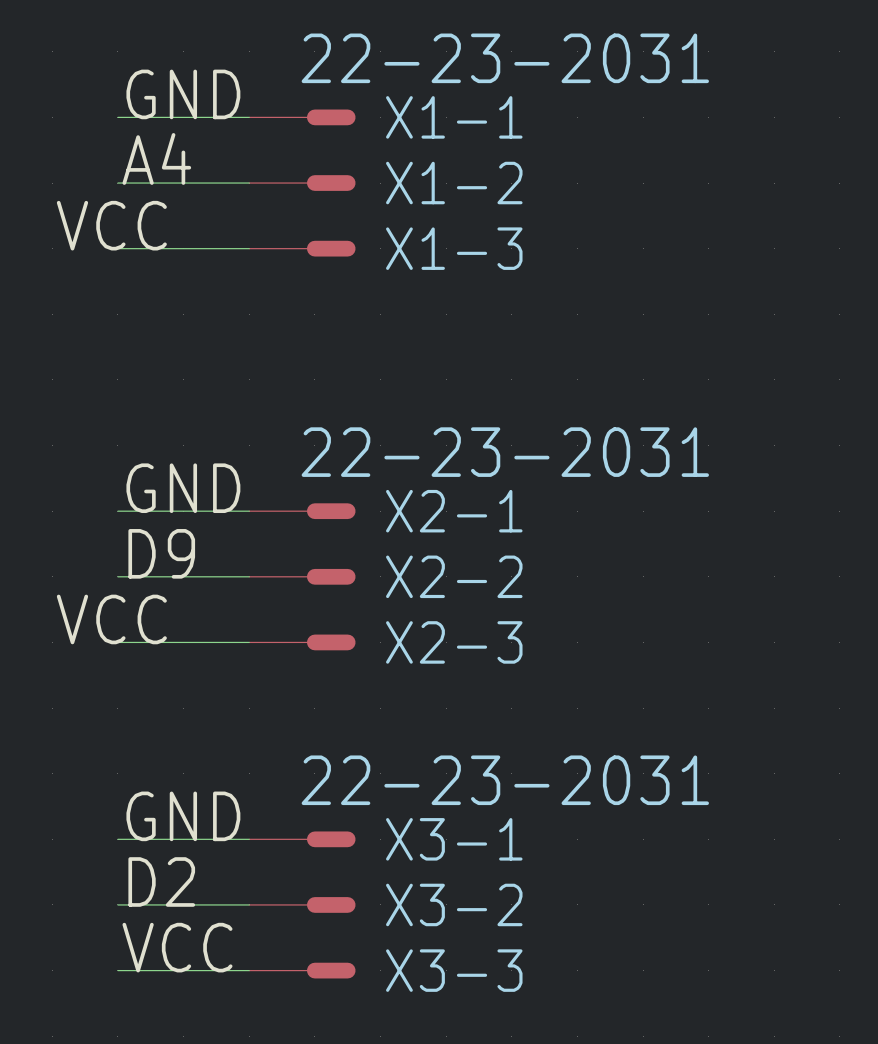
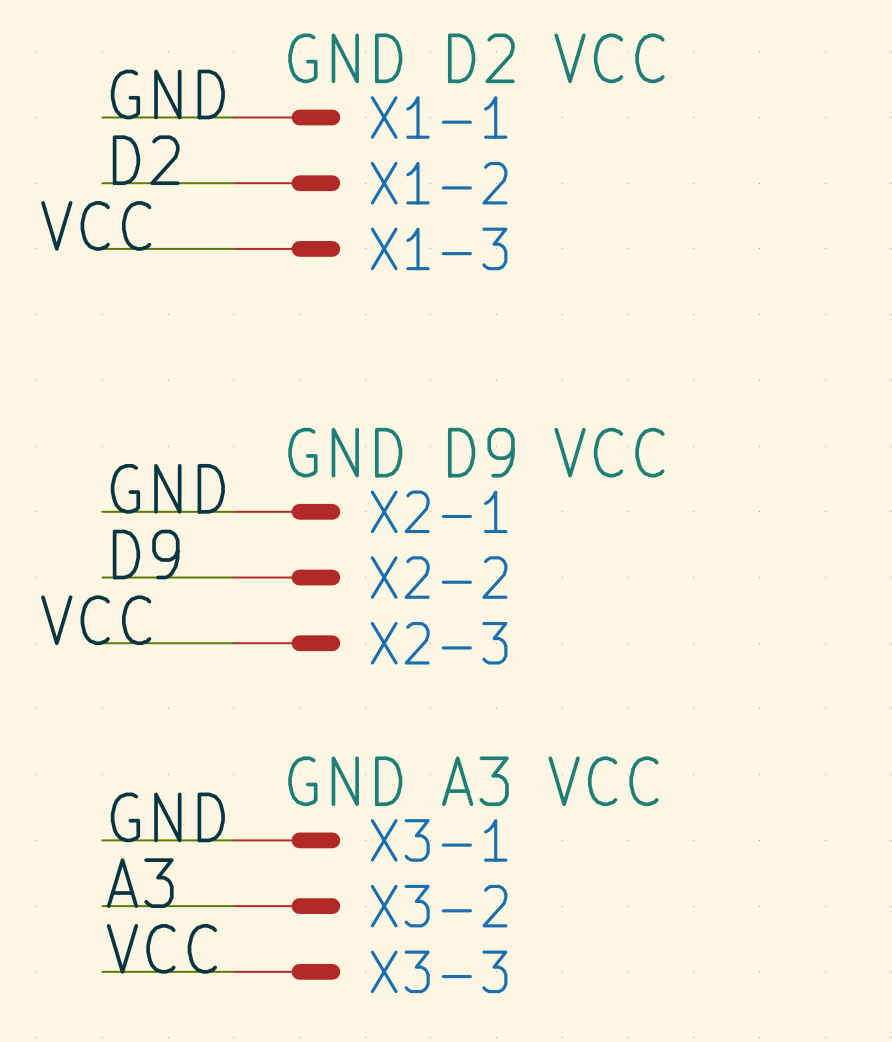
X1-1 value: 22-23-2031 (505, 58) -> GND D2 VCC (476, 58)
label: A4 (156, 158) -> D2 (146, 160)
X2-1 value: 22-23-2031 (505, 452) -> GND D9 VCC (476, 452)
X3-1 value: 22-23-2031 (505, 780) -> GND A3 VCC (473, 781)
label: D2 (161, 881) -> A3 (140, 883)

